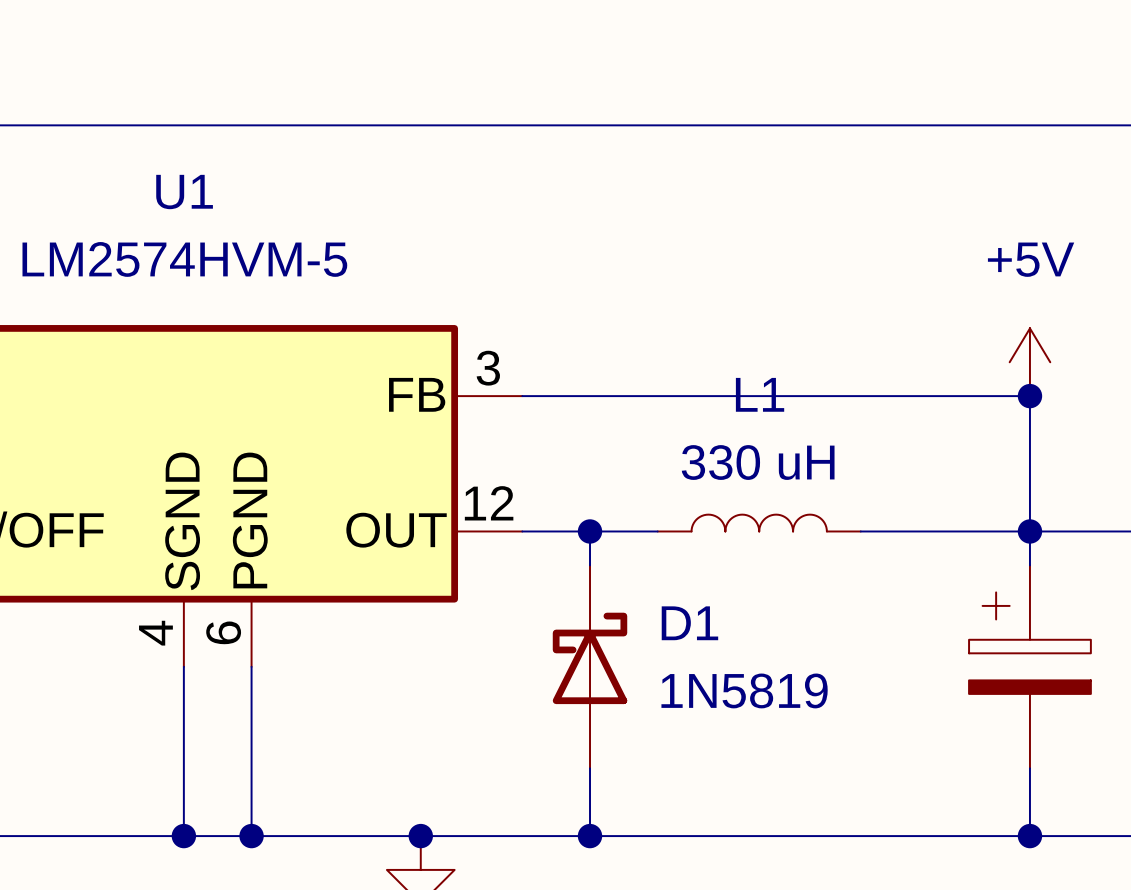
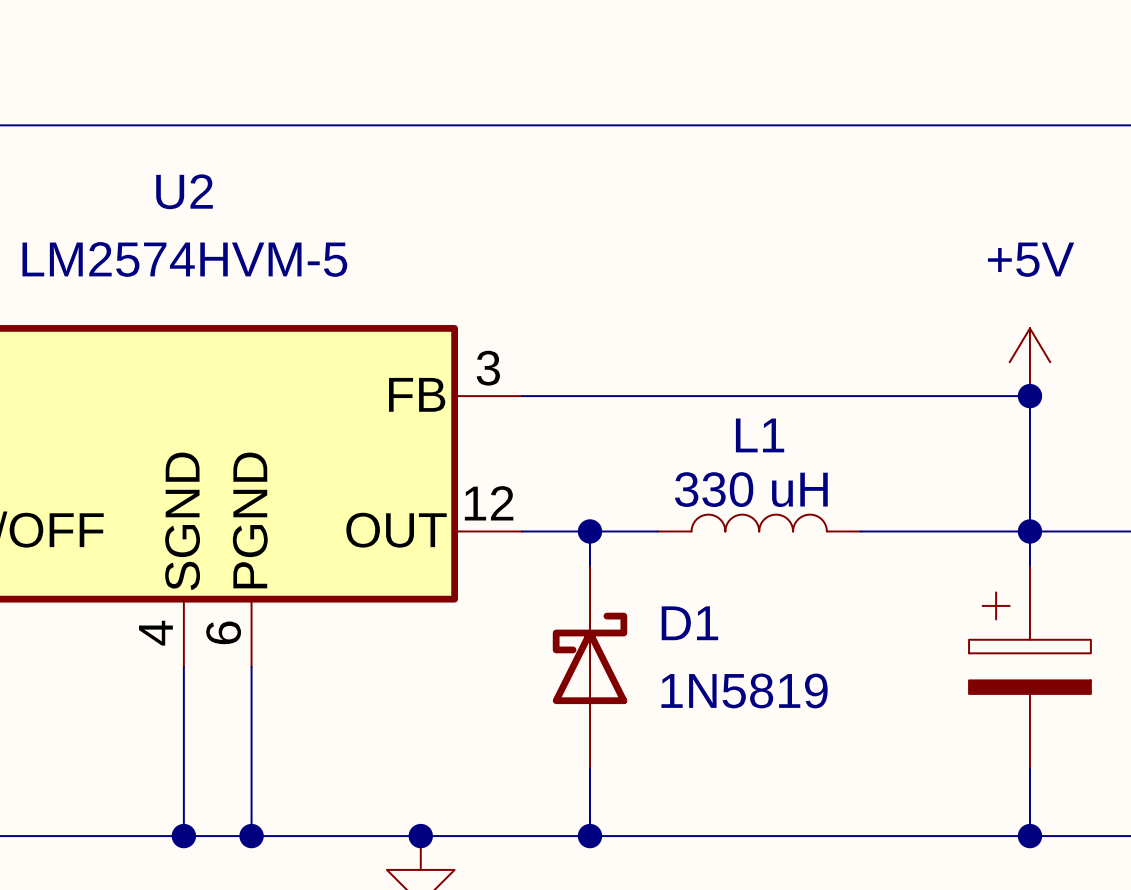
U1 name: U1 (184, 192) -> U2 (184, 191)
L1 name position: L1 (760, 394) -> L1 (760, 435)
L1 value position: 330 uH (758, 462) -> 330 uH (751, 489)

